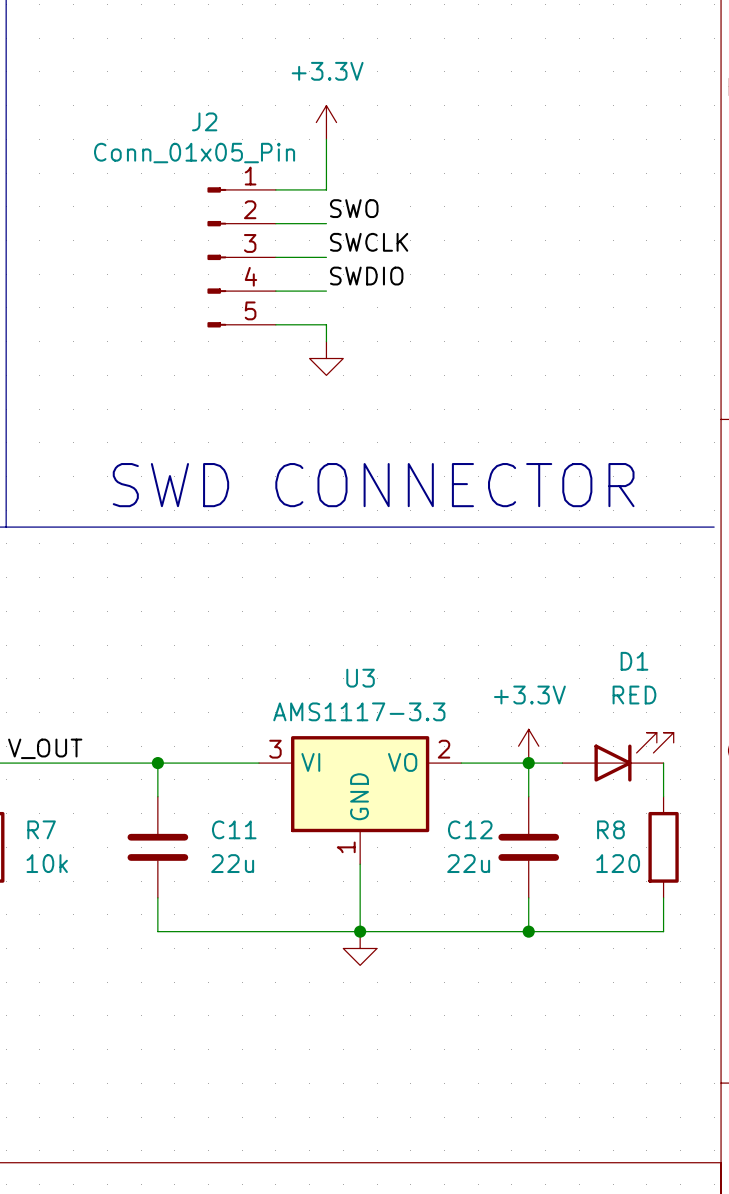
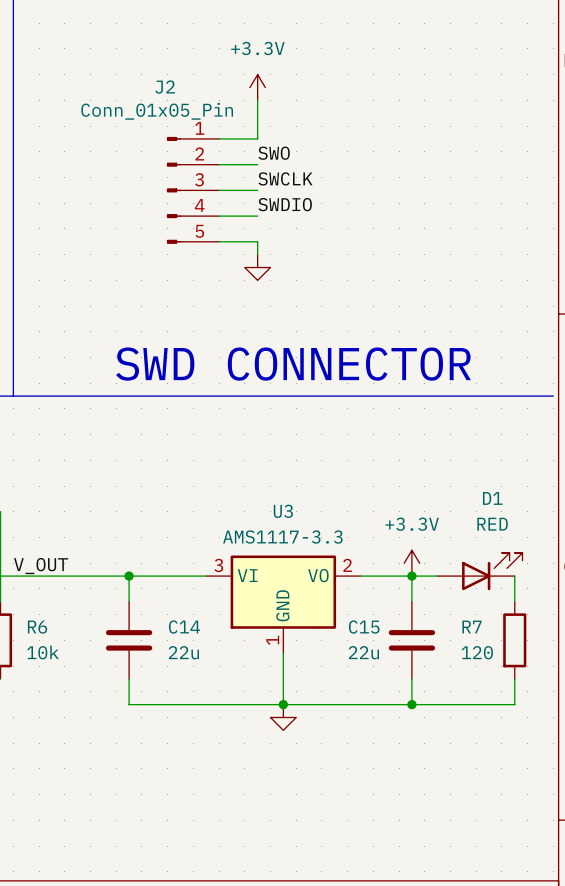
R7 name: R7 (41, 829) -> R6 (37, 627)
C11 name: C11 (234, 829) -> C14 (184, 627)
C12 name: C12 (470, 829) -> C15 (364, 627)
R8 name: R8 (610, 829) -> R7 (472, 627)

